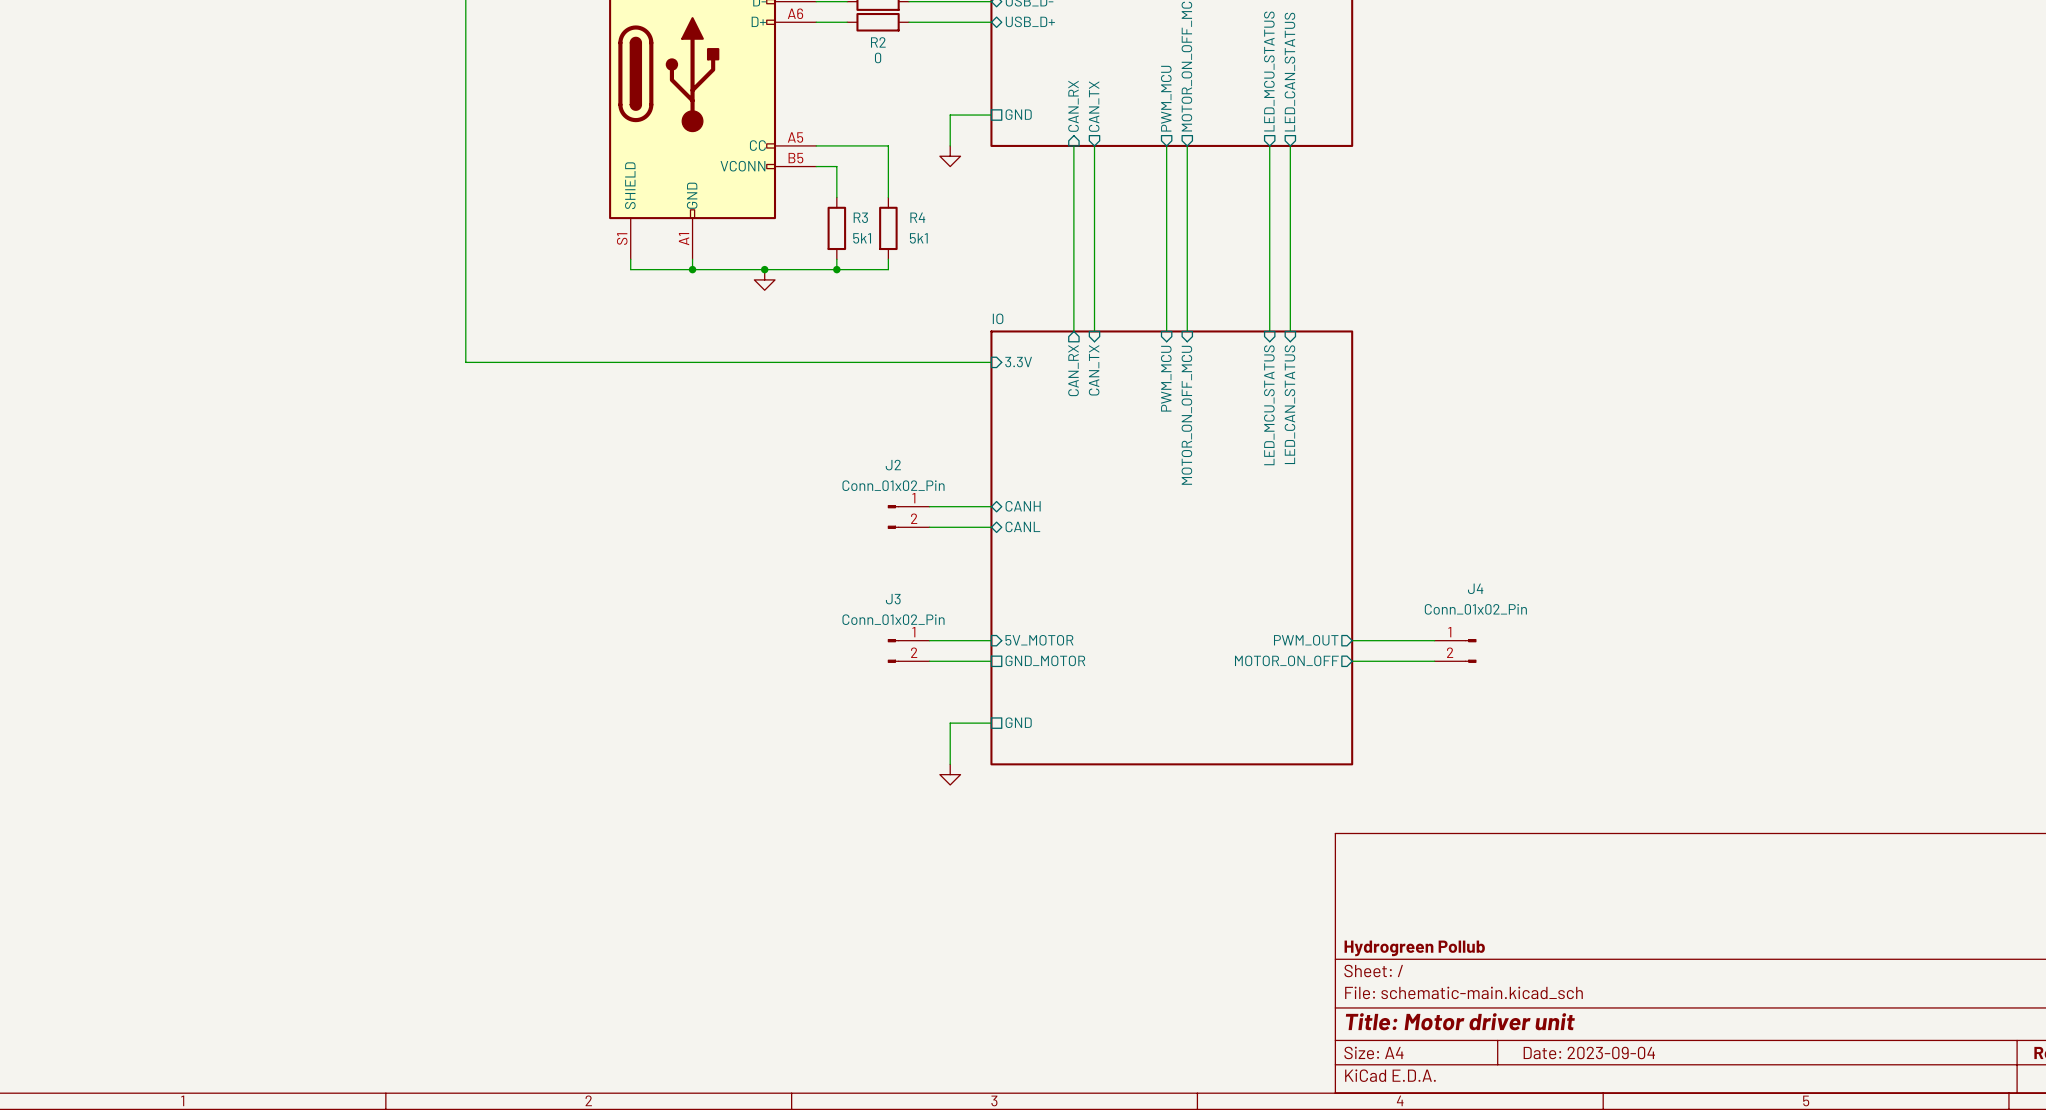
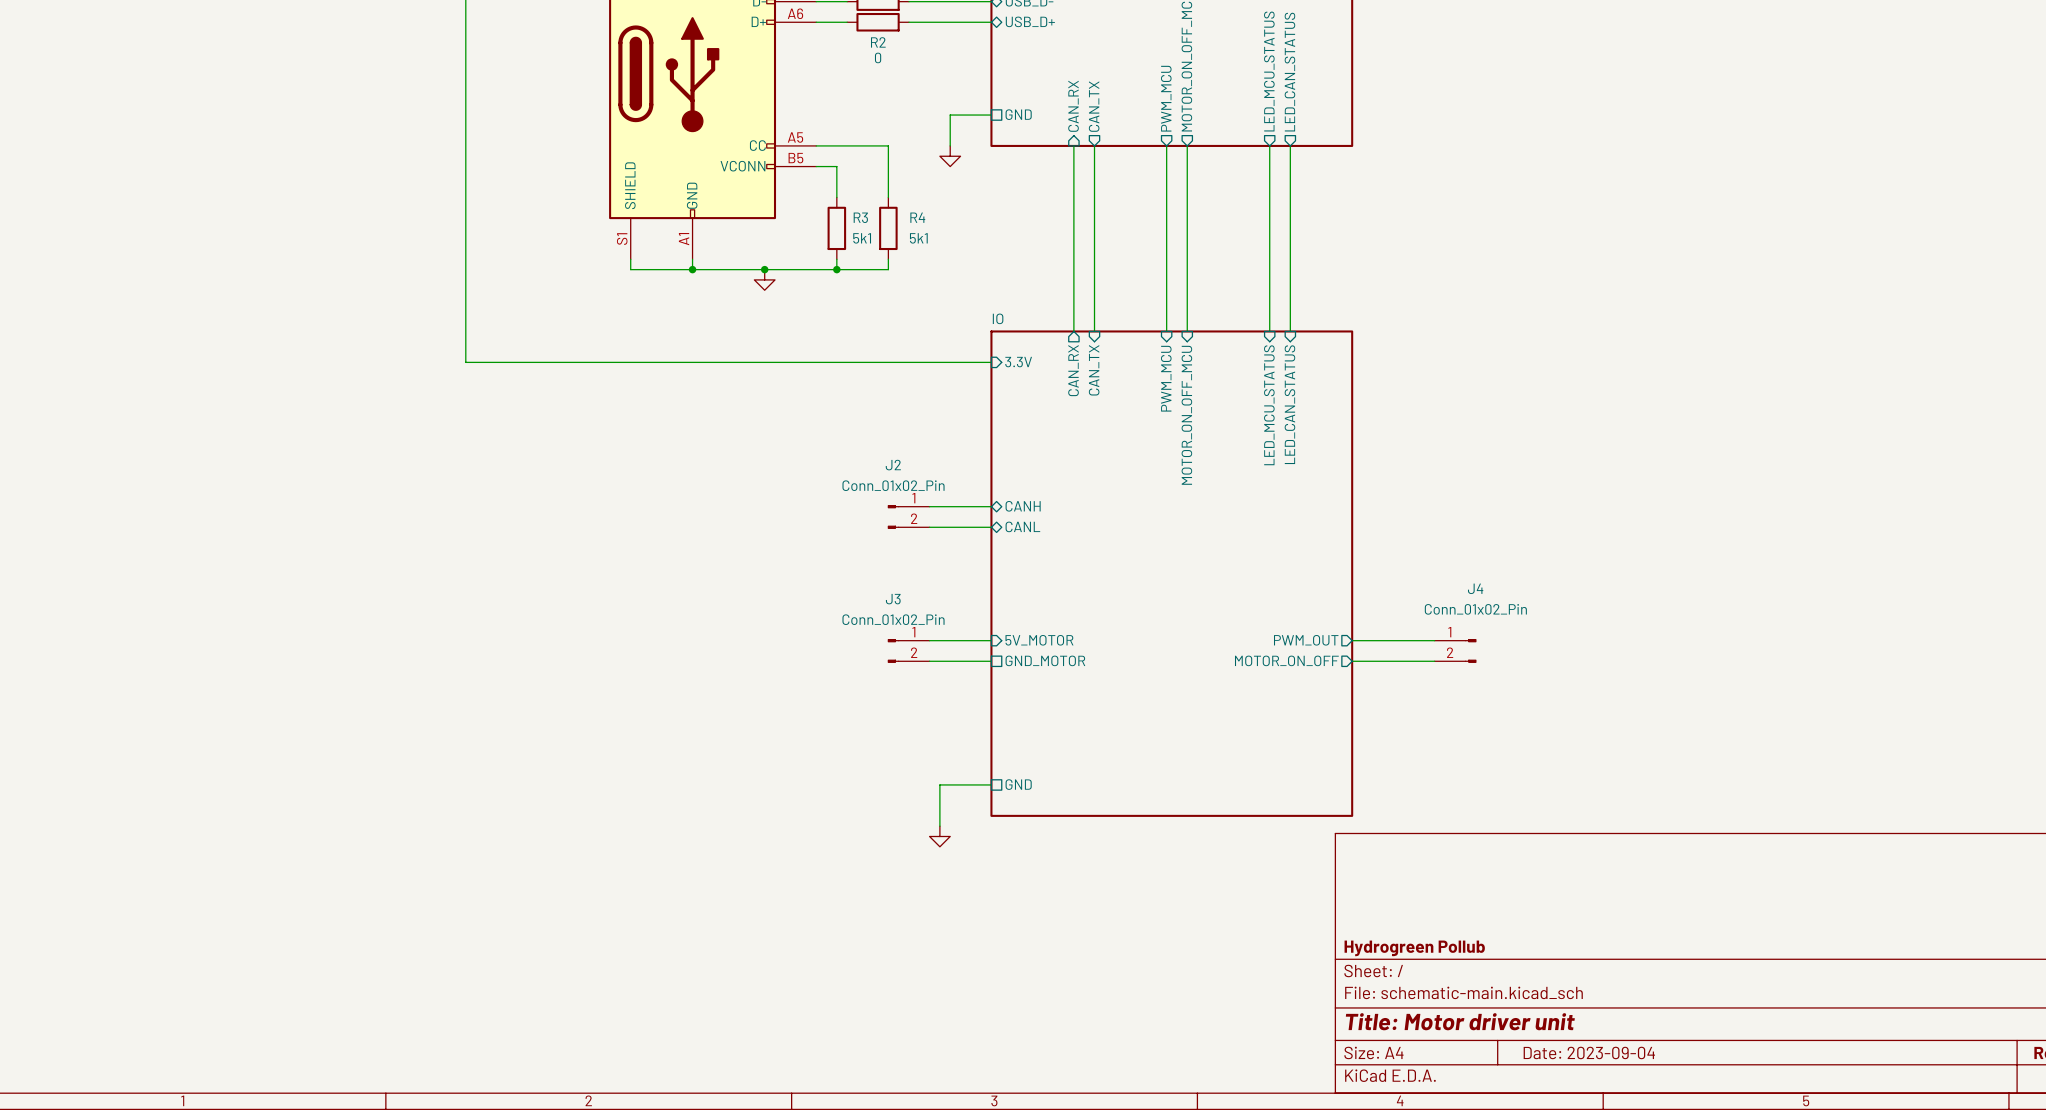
sheet IO: (1171, 547) -> none
sheet IO: none -> (1171, 573)
sheet pin position: GND (1018, 722) -> GND (1018, 784)
wire: (991, 723) (950, 723) (950, 764) -> none
power symbol position: (950, 774) -> (939, 836)
wire: none -> (991, 784) (939, 784) (939, 826)

